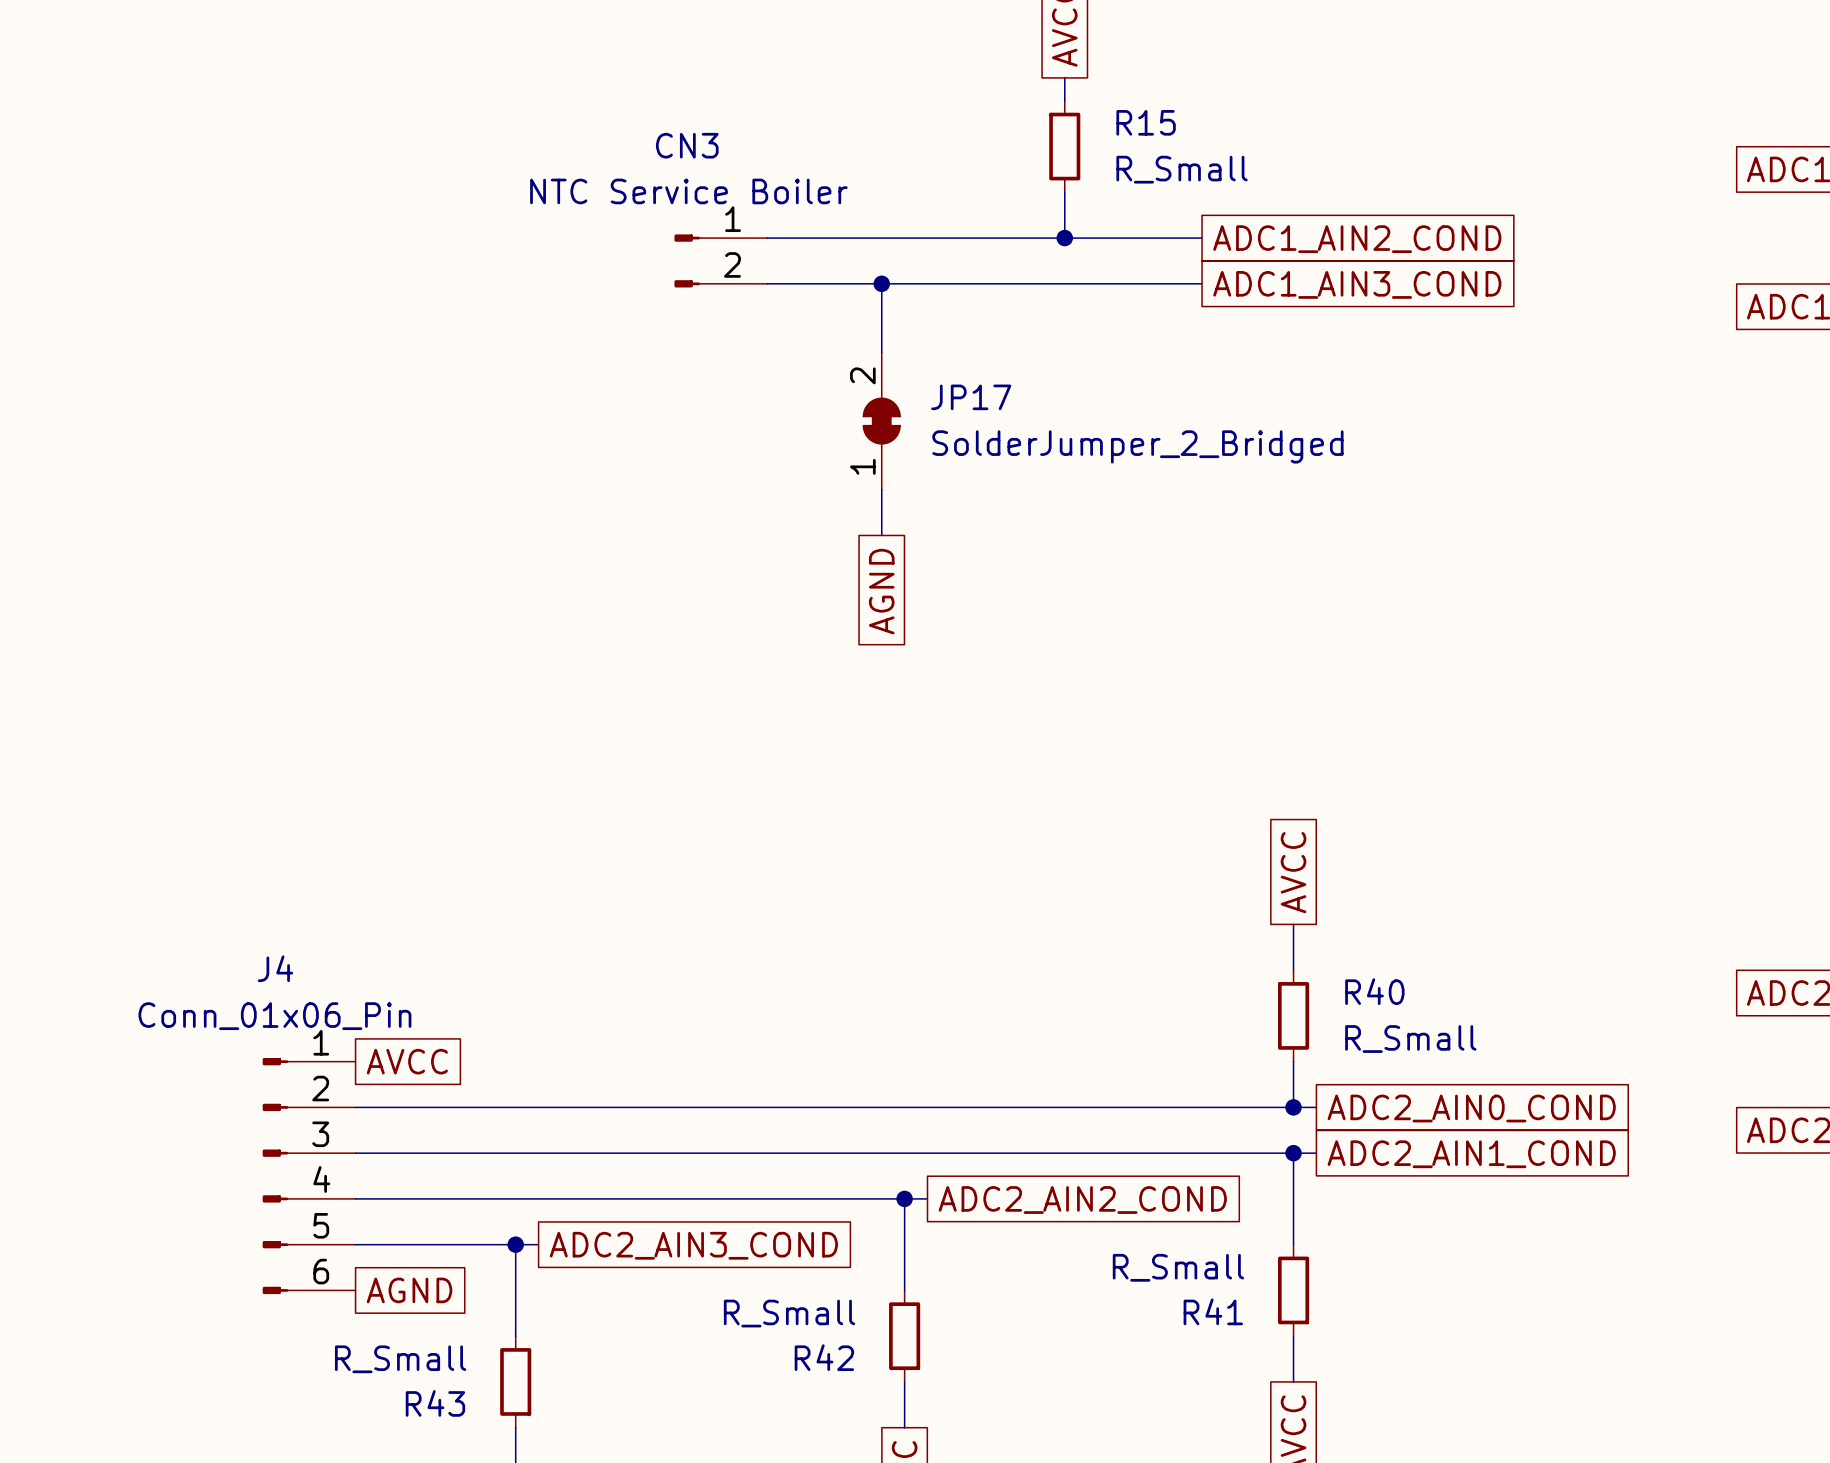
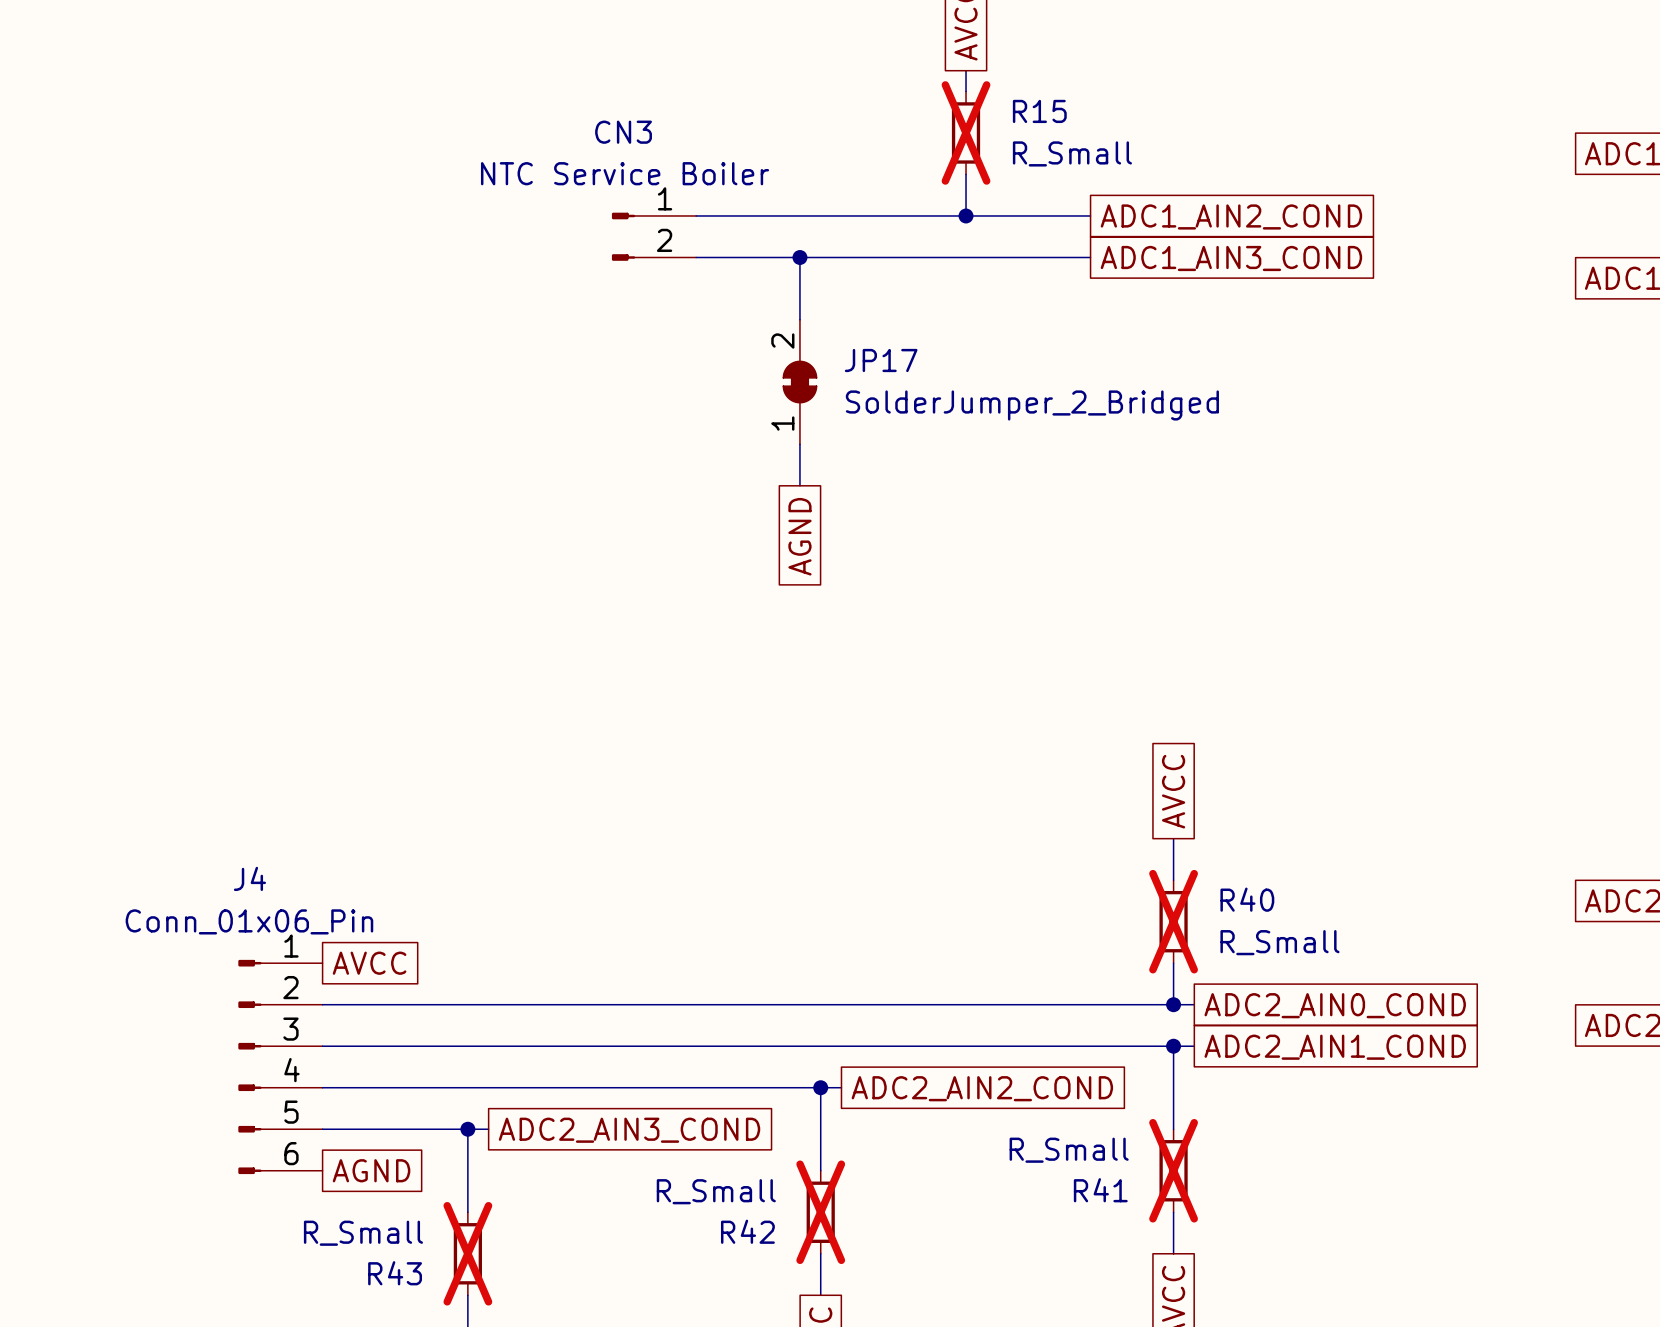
R15 do-not-place cross: none -> (966, 132)
R40 do-not-place cross: none -> (1173, 921)
R41 do-not-place cross: none -> (1173, 1170)
R42 do-not-place cross: none -> (820, 1212)
R43 do-not-place cross: none -> (467, 1253)

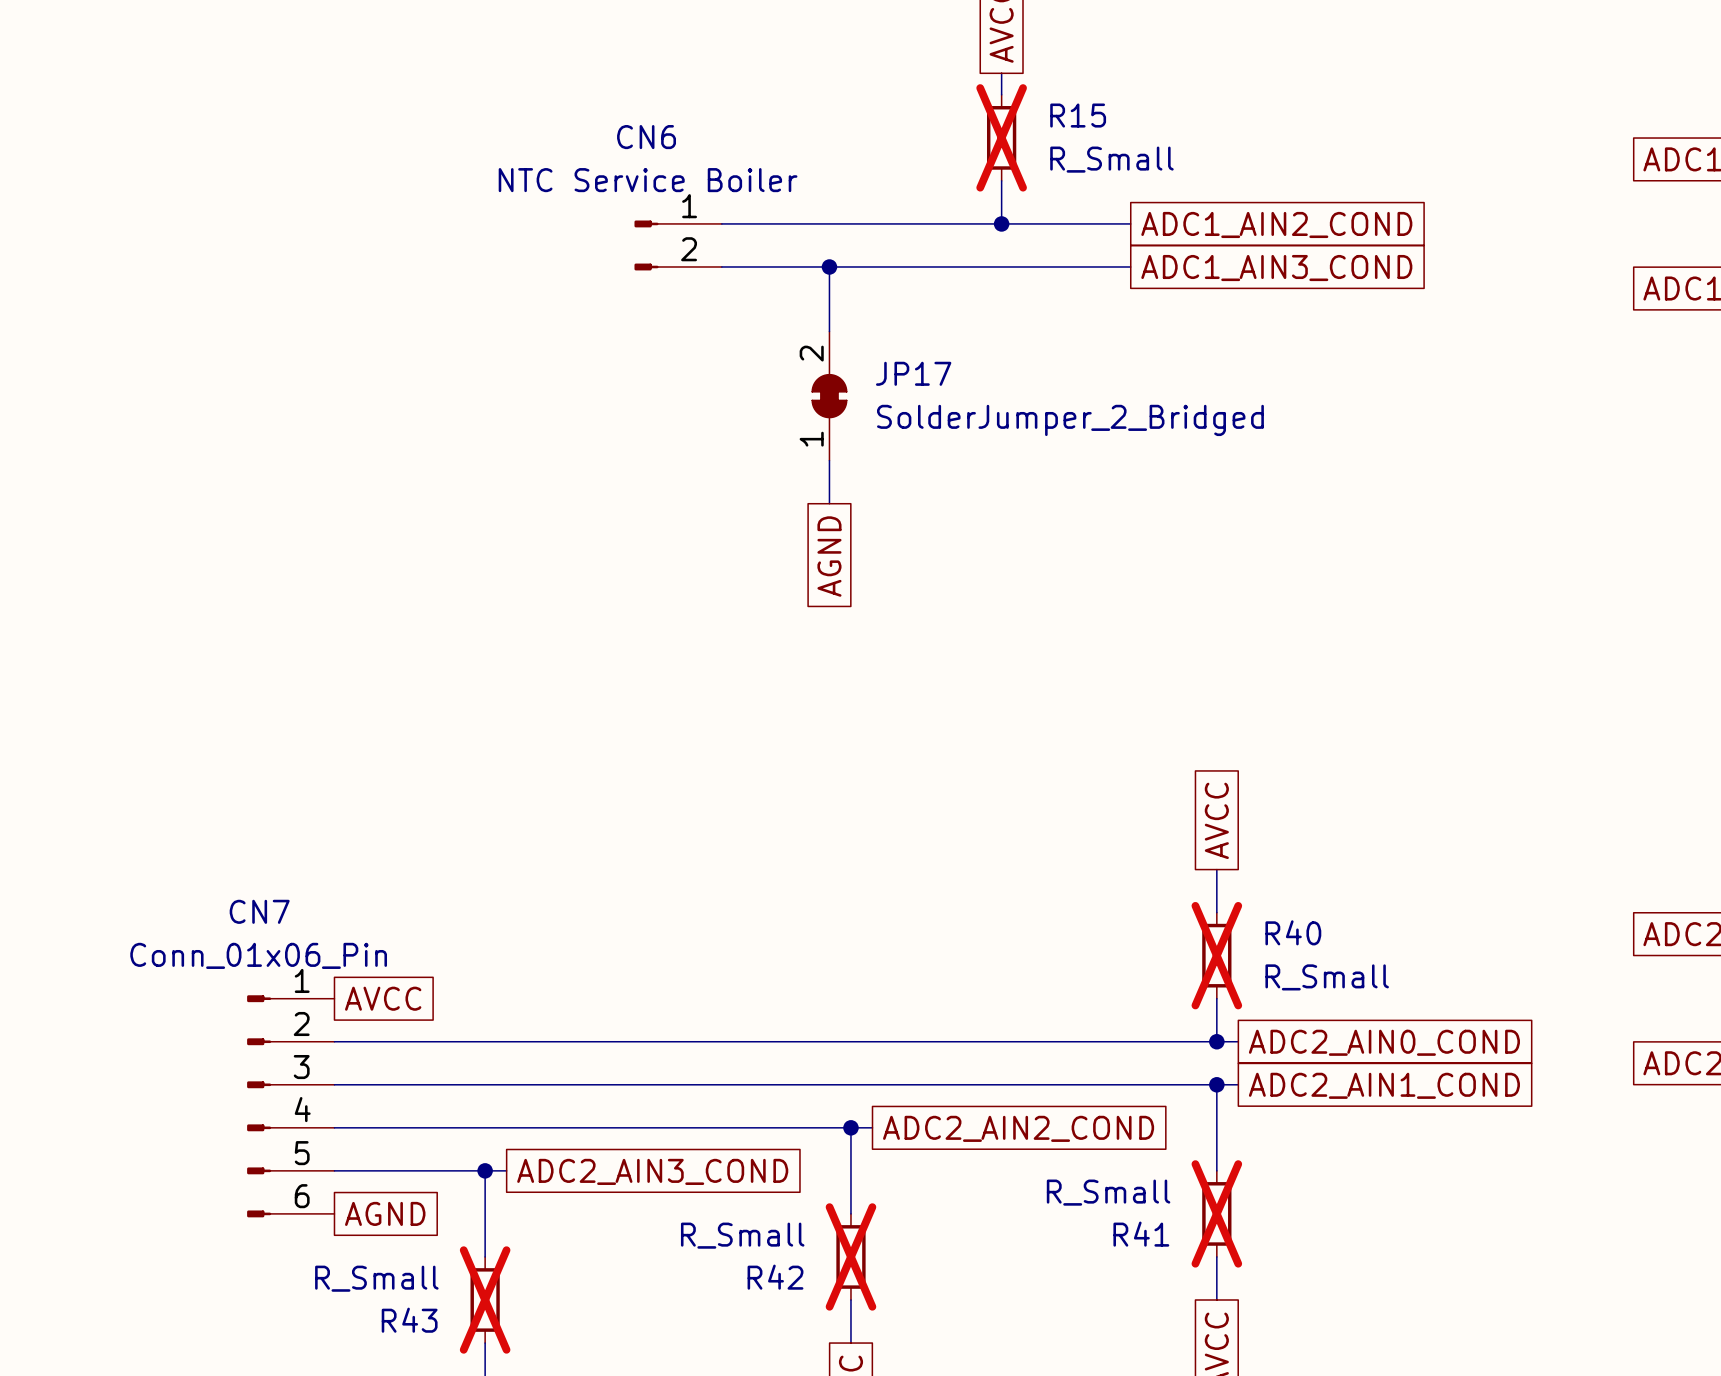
CN3 name: CN3 (623, 132) -> CN6 (646, 137)
J4 name: J4 (249, 878) -> CN7 (259, 911)

